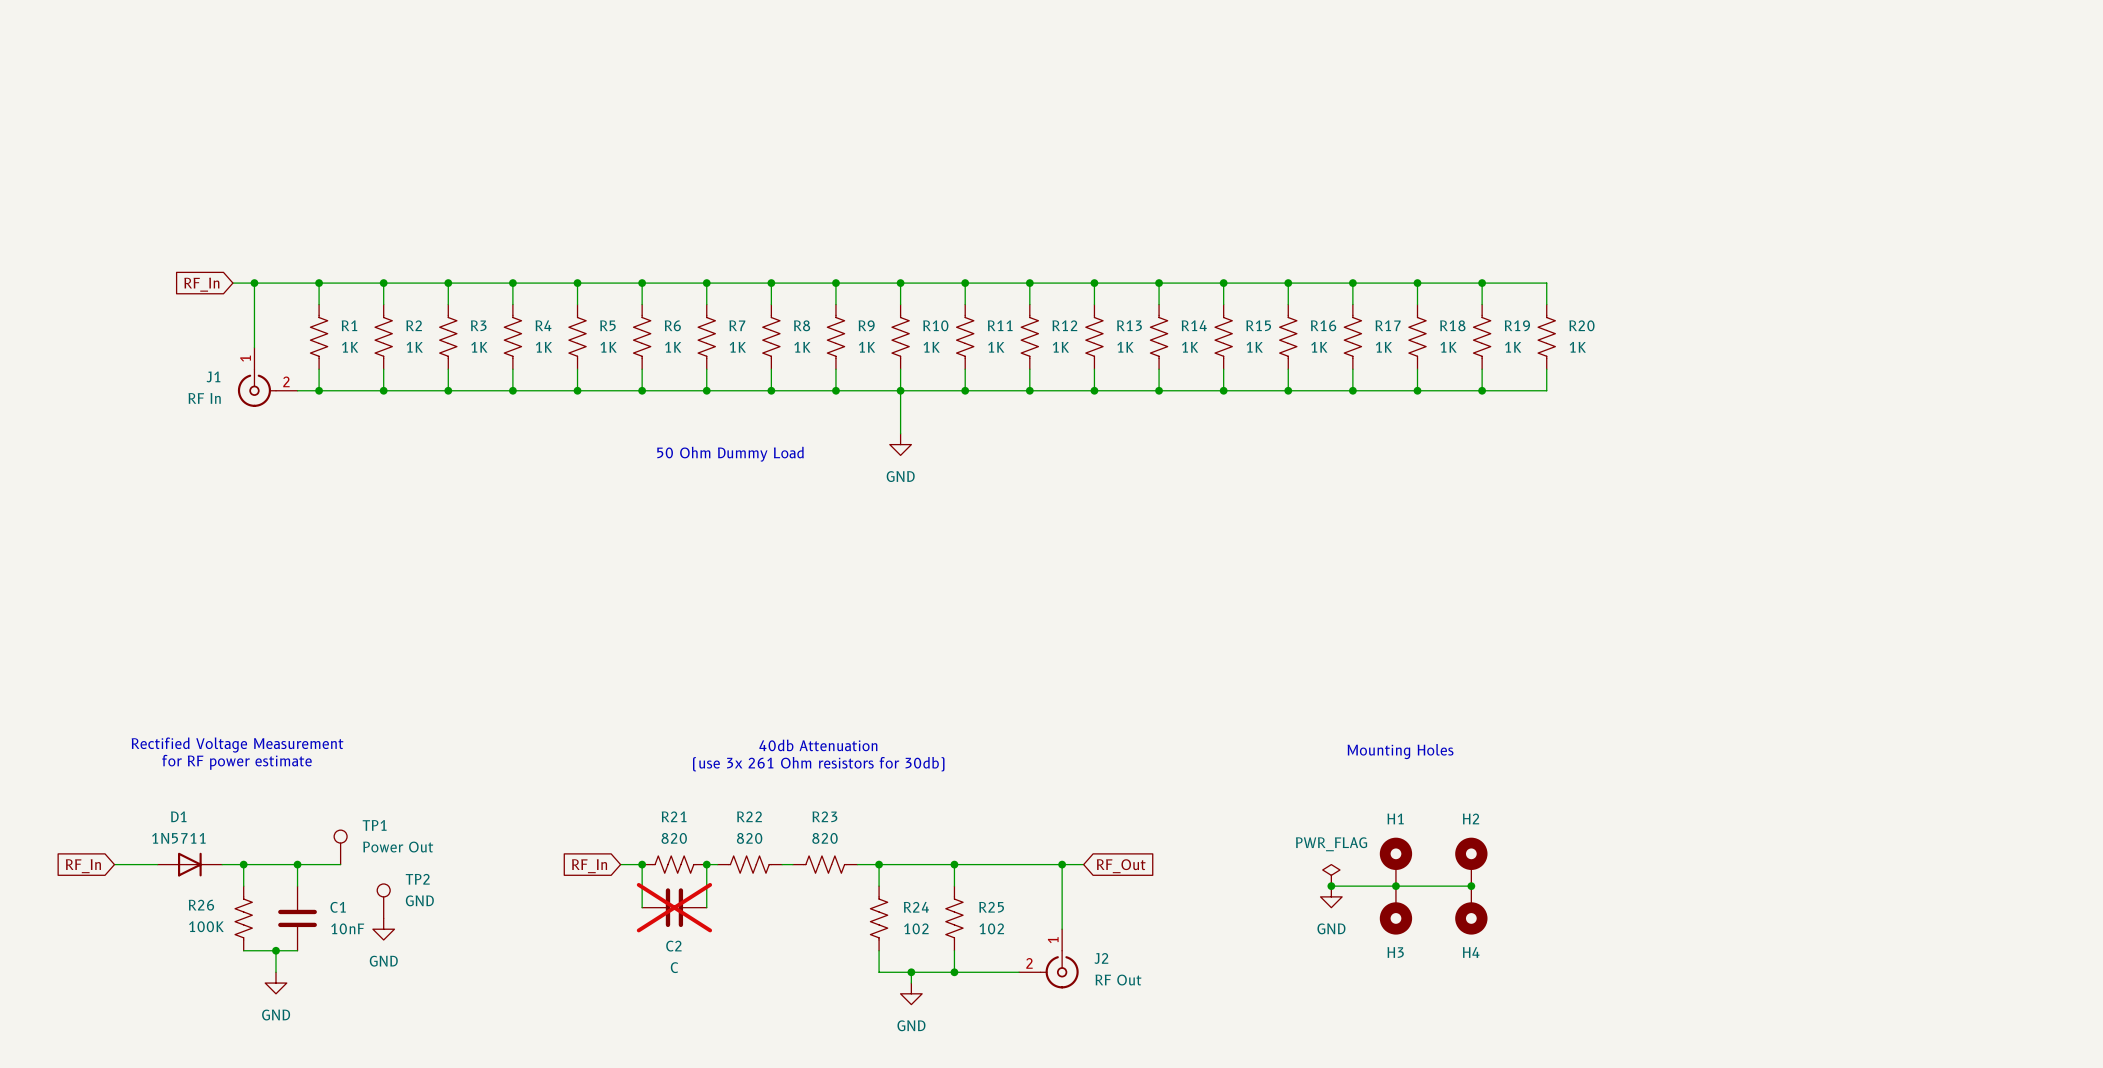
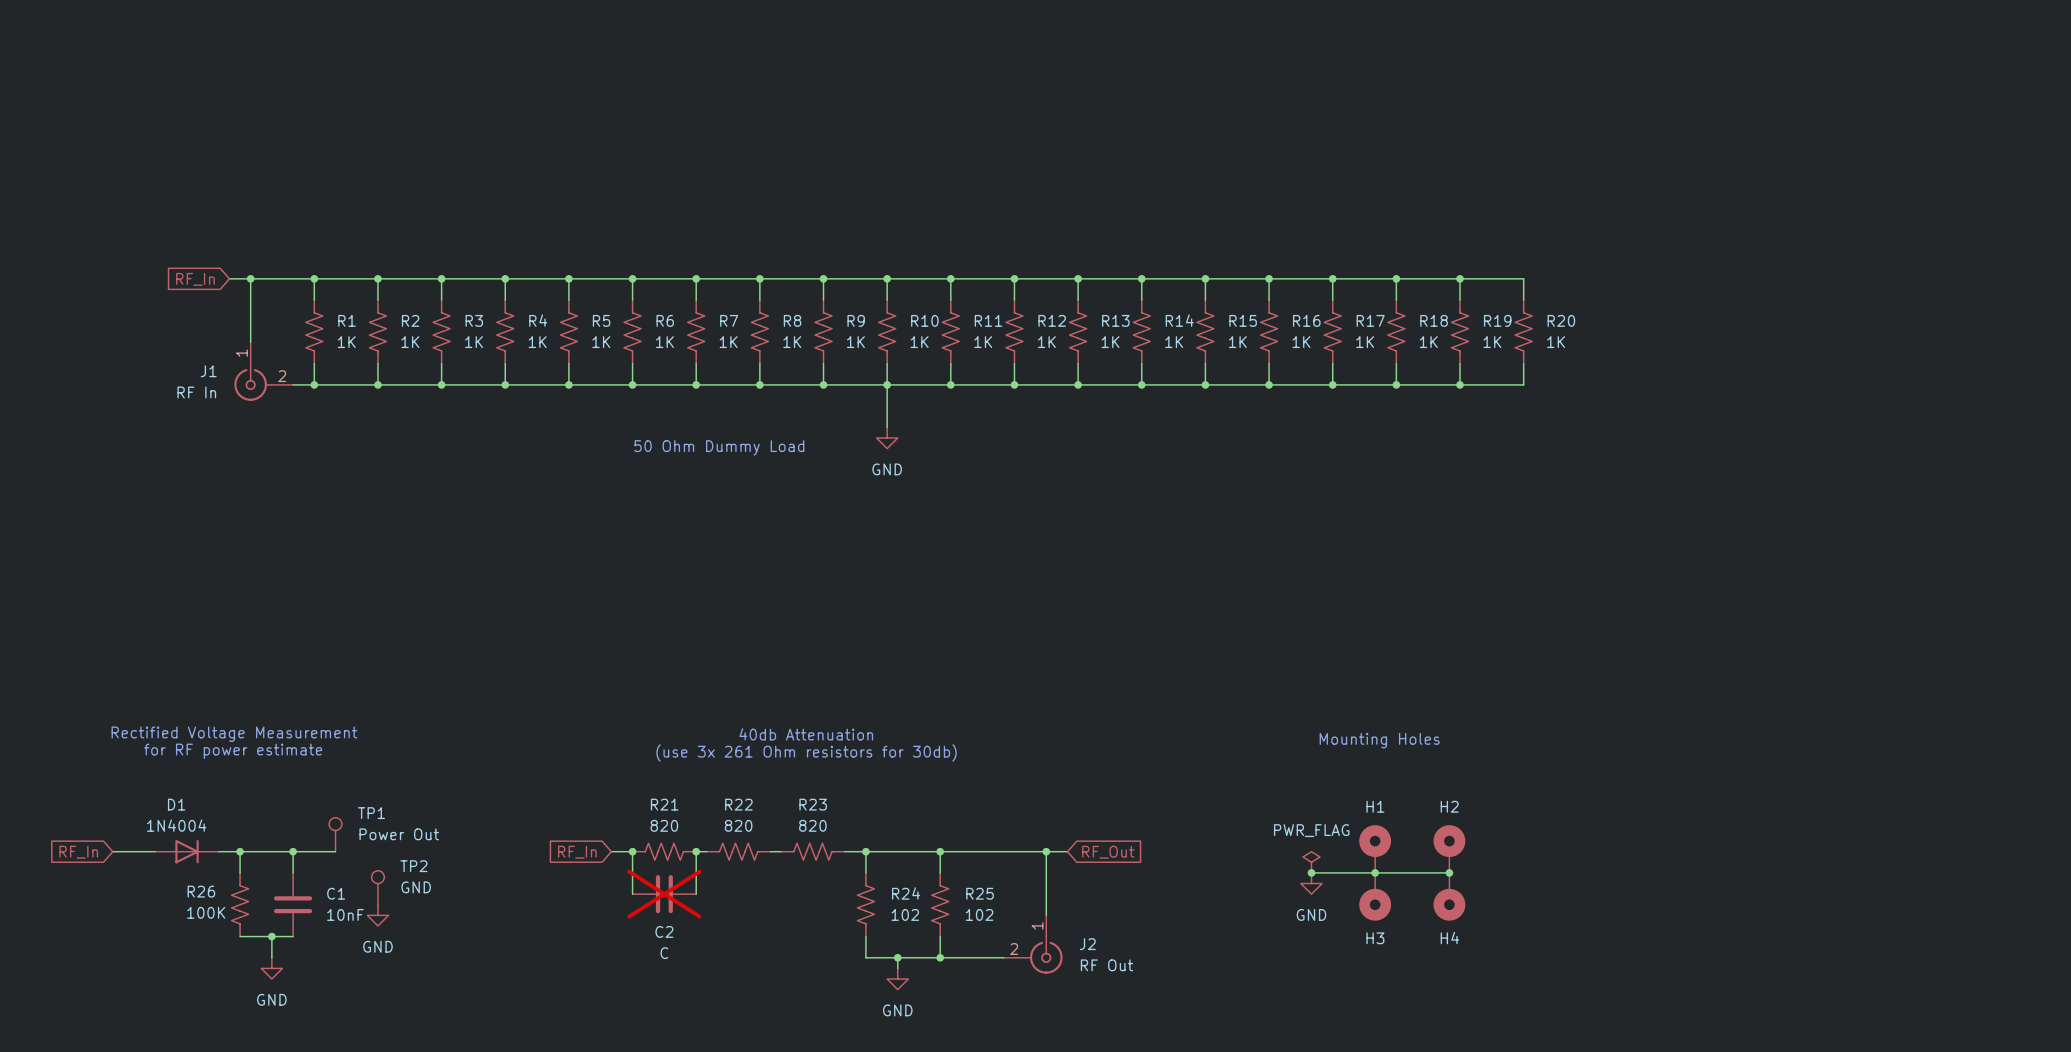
D1 value: 1N5711 (178, 838) -> 1N4004 (176, 825)

